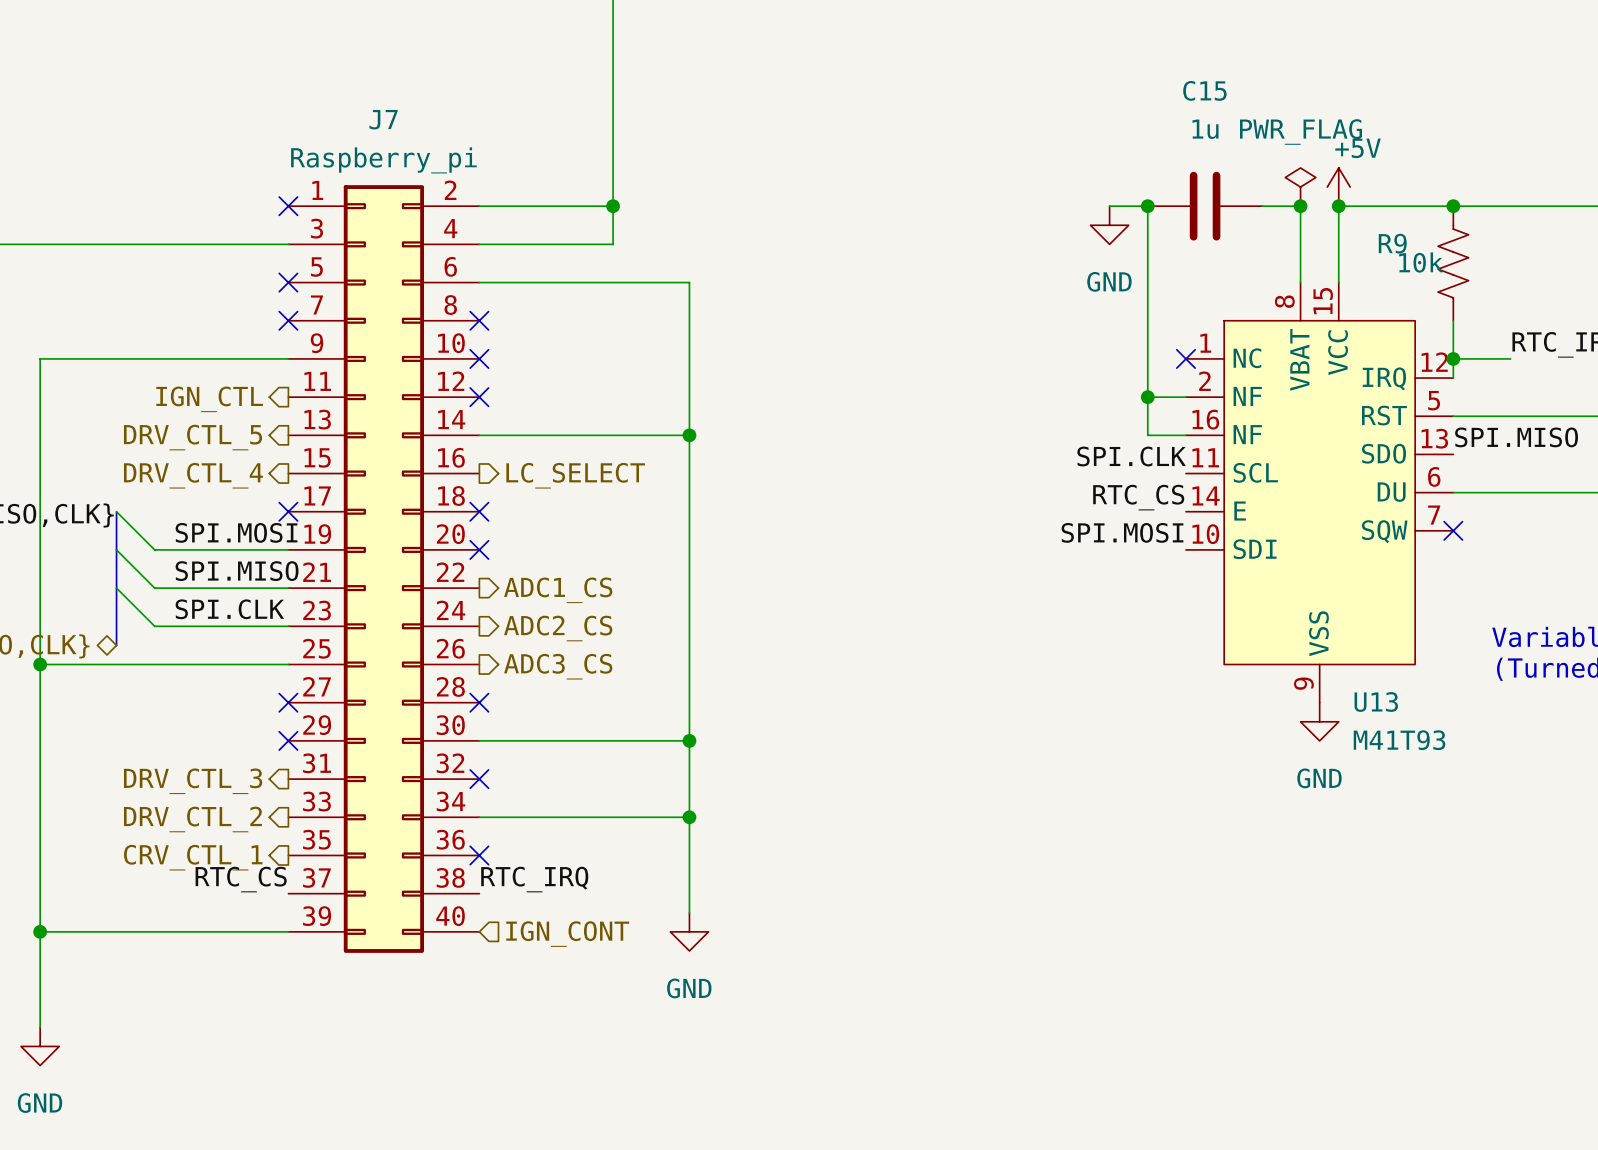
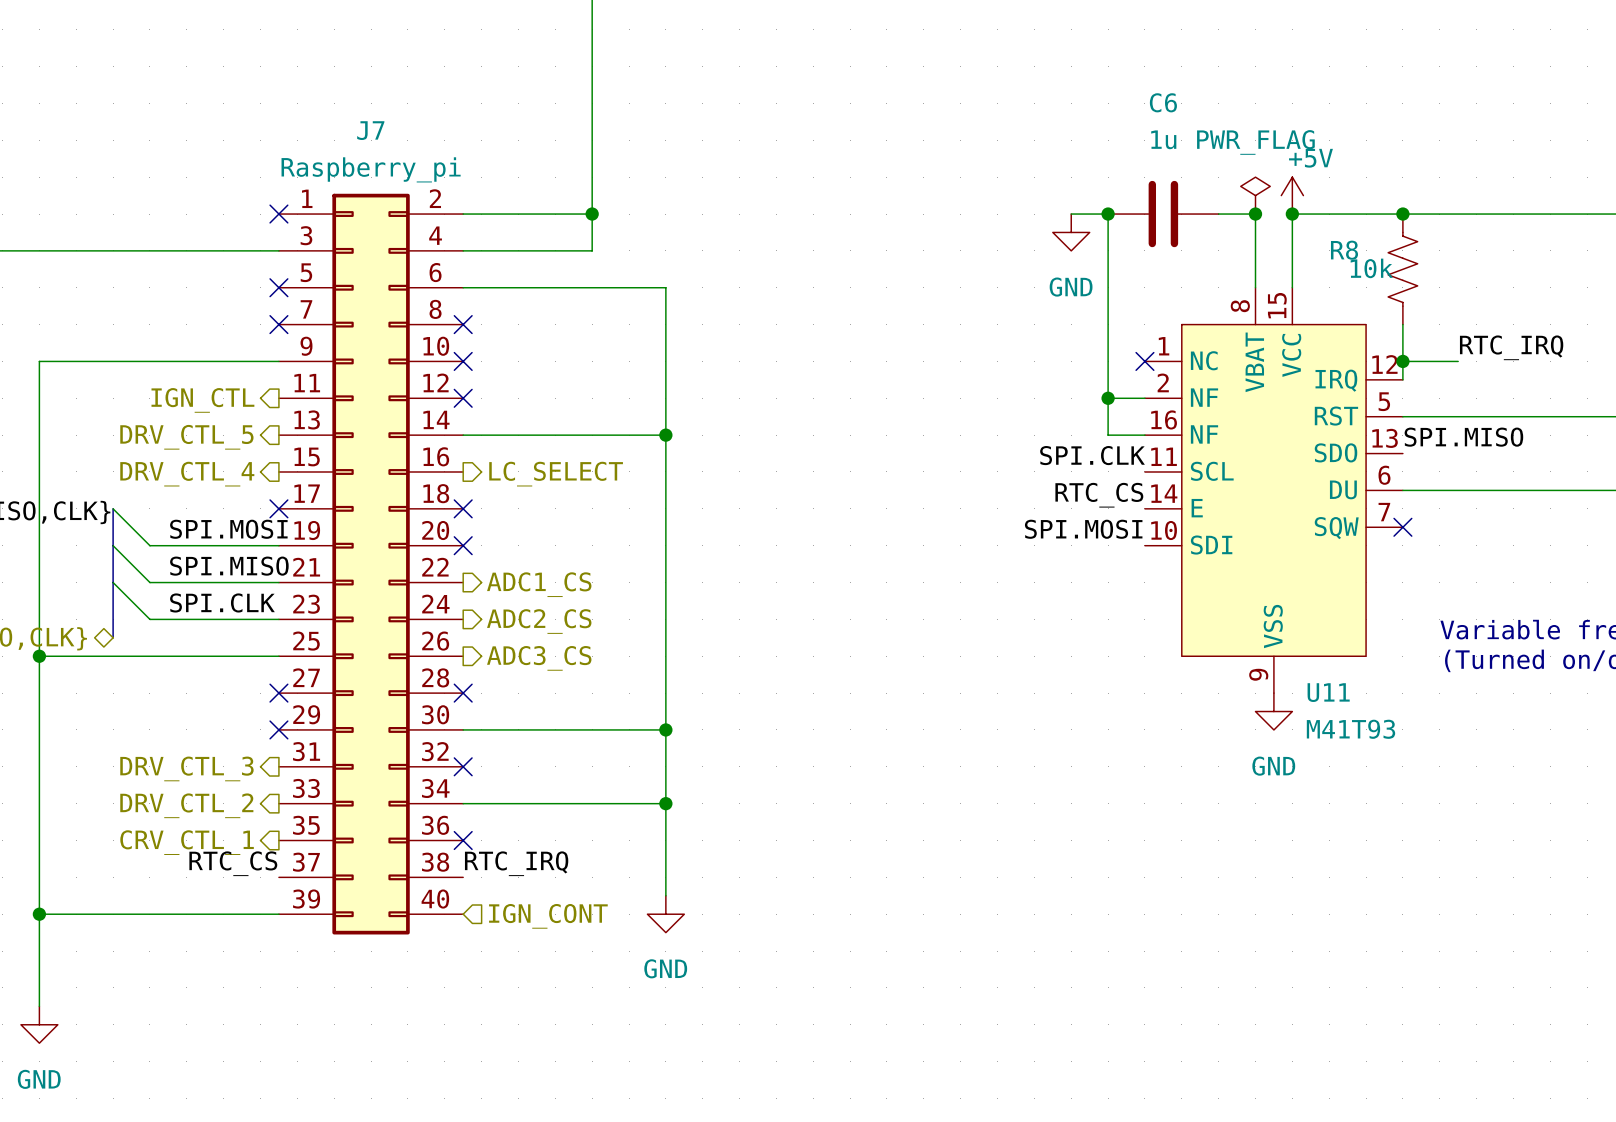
C15 name: C15 (1204, 90) -> C6 (1163, 102)
R9 name: R9 (1392, 243) -> R8 (1344, 250)
U13 name: U13 (1376, 701) -> U11 (1328, 692)

